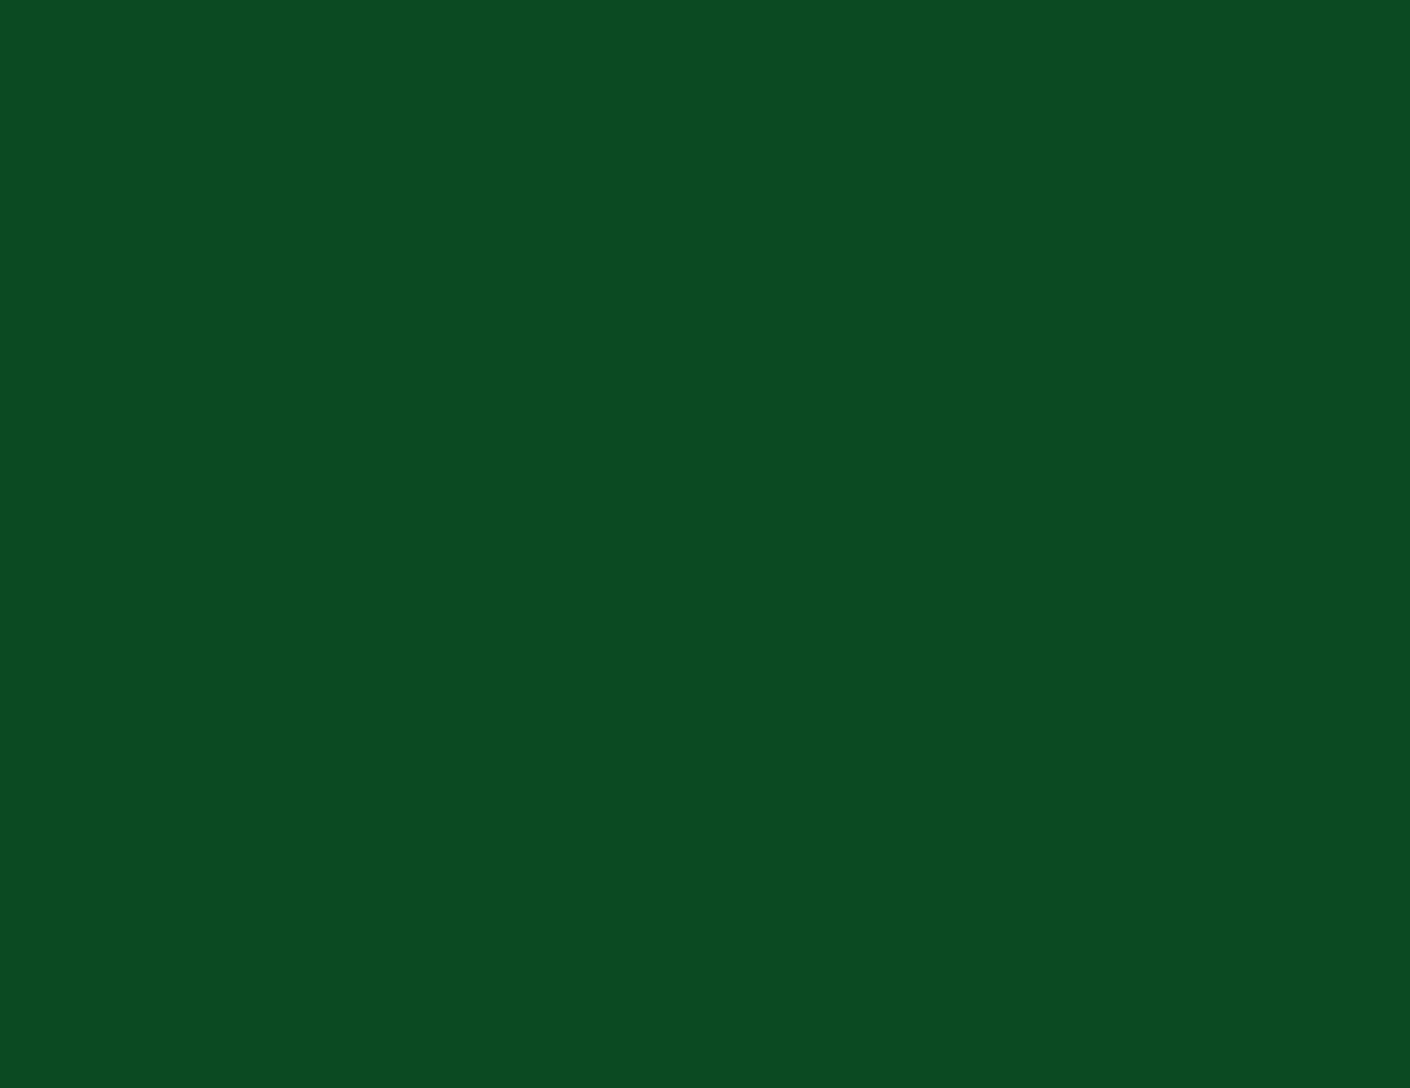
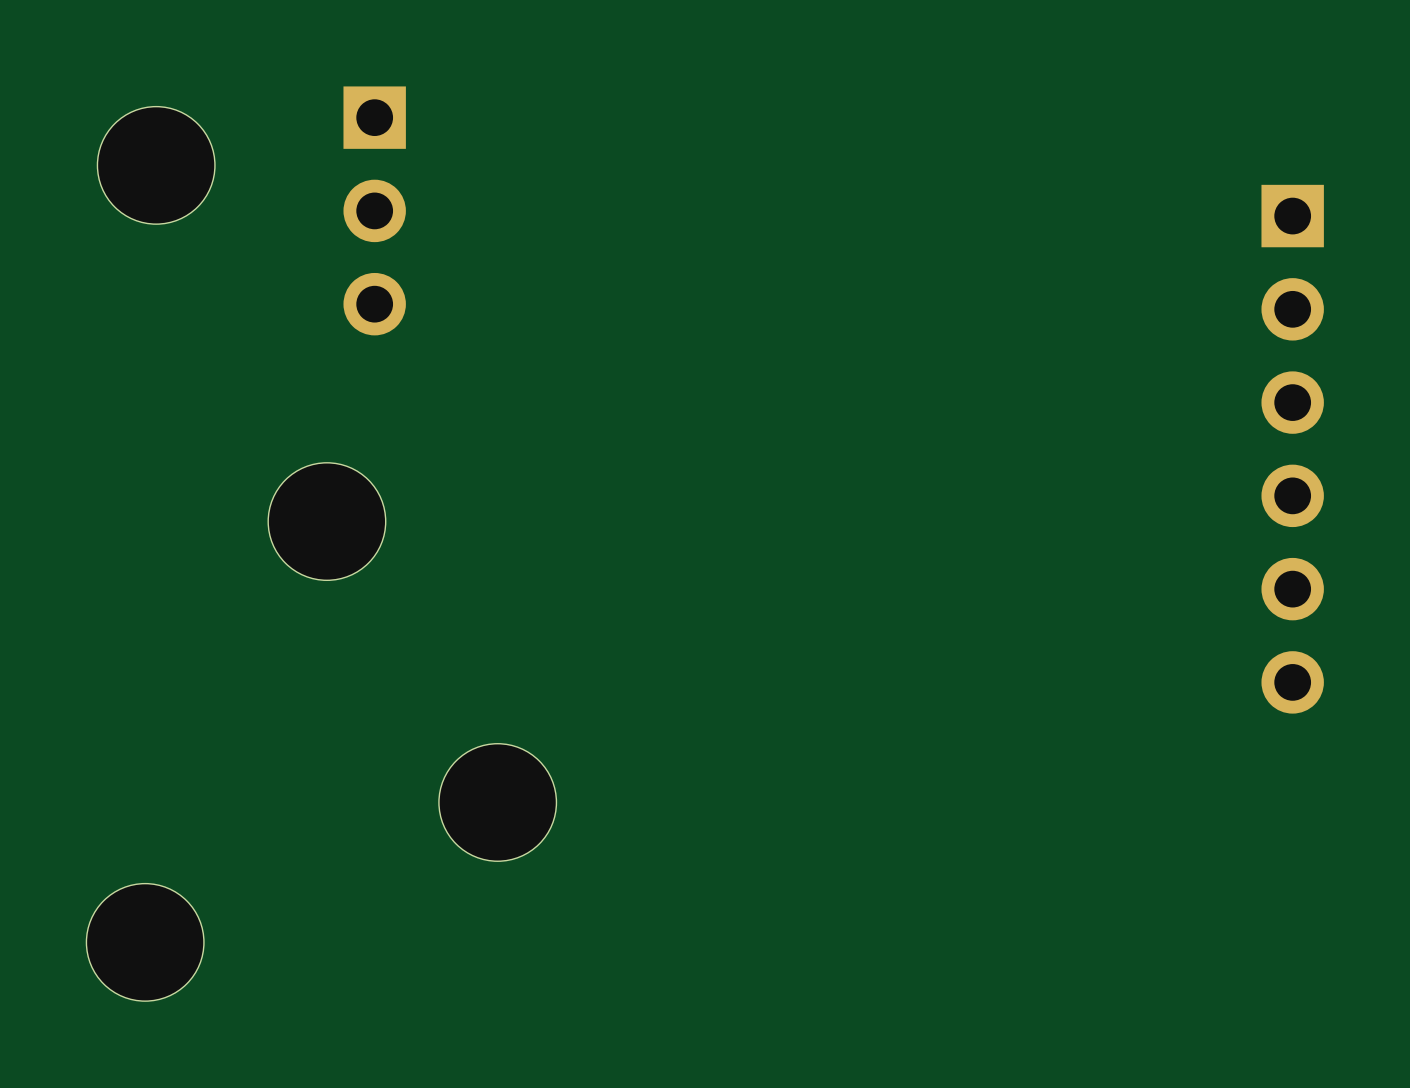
part: none -> (156, 165)
part: none -> (374, 210)
part: none -> (1292, 449)
part: none -> (326, 521)
part: none -> (497, 802)
part: none -> (145, 942)

